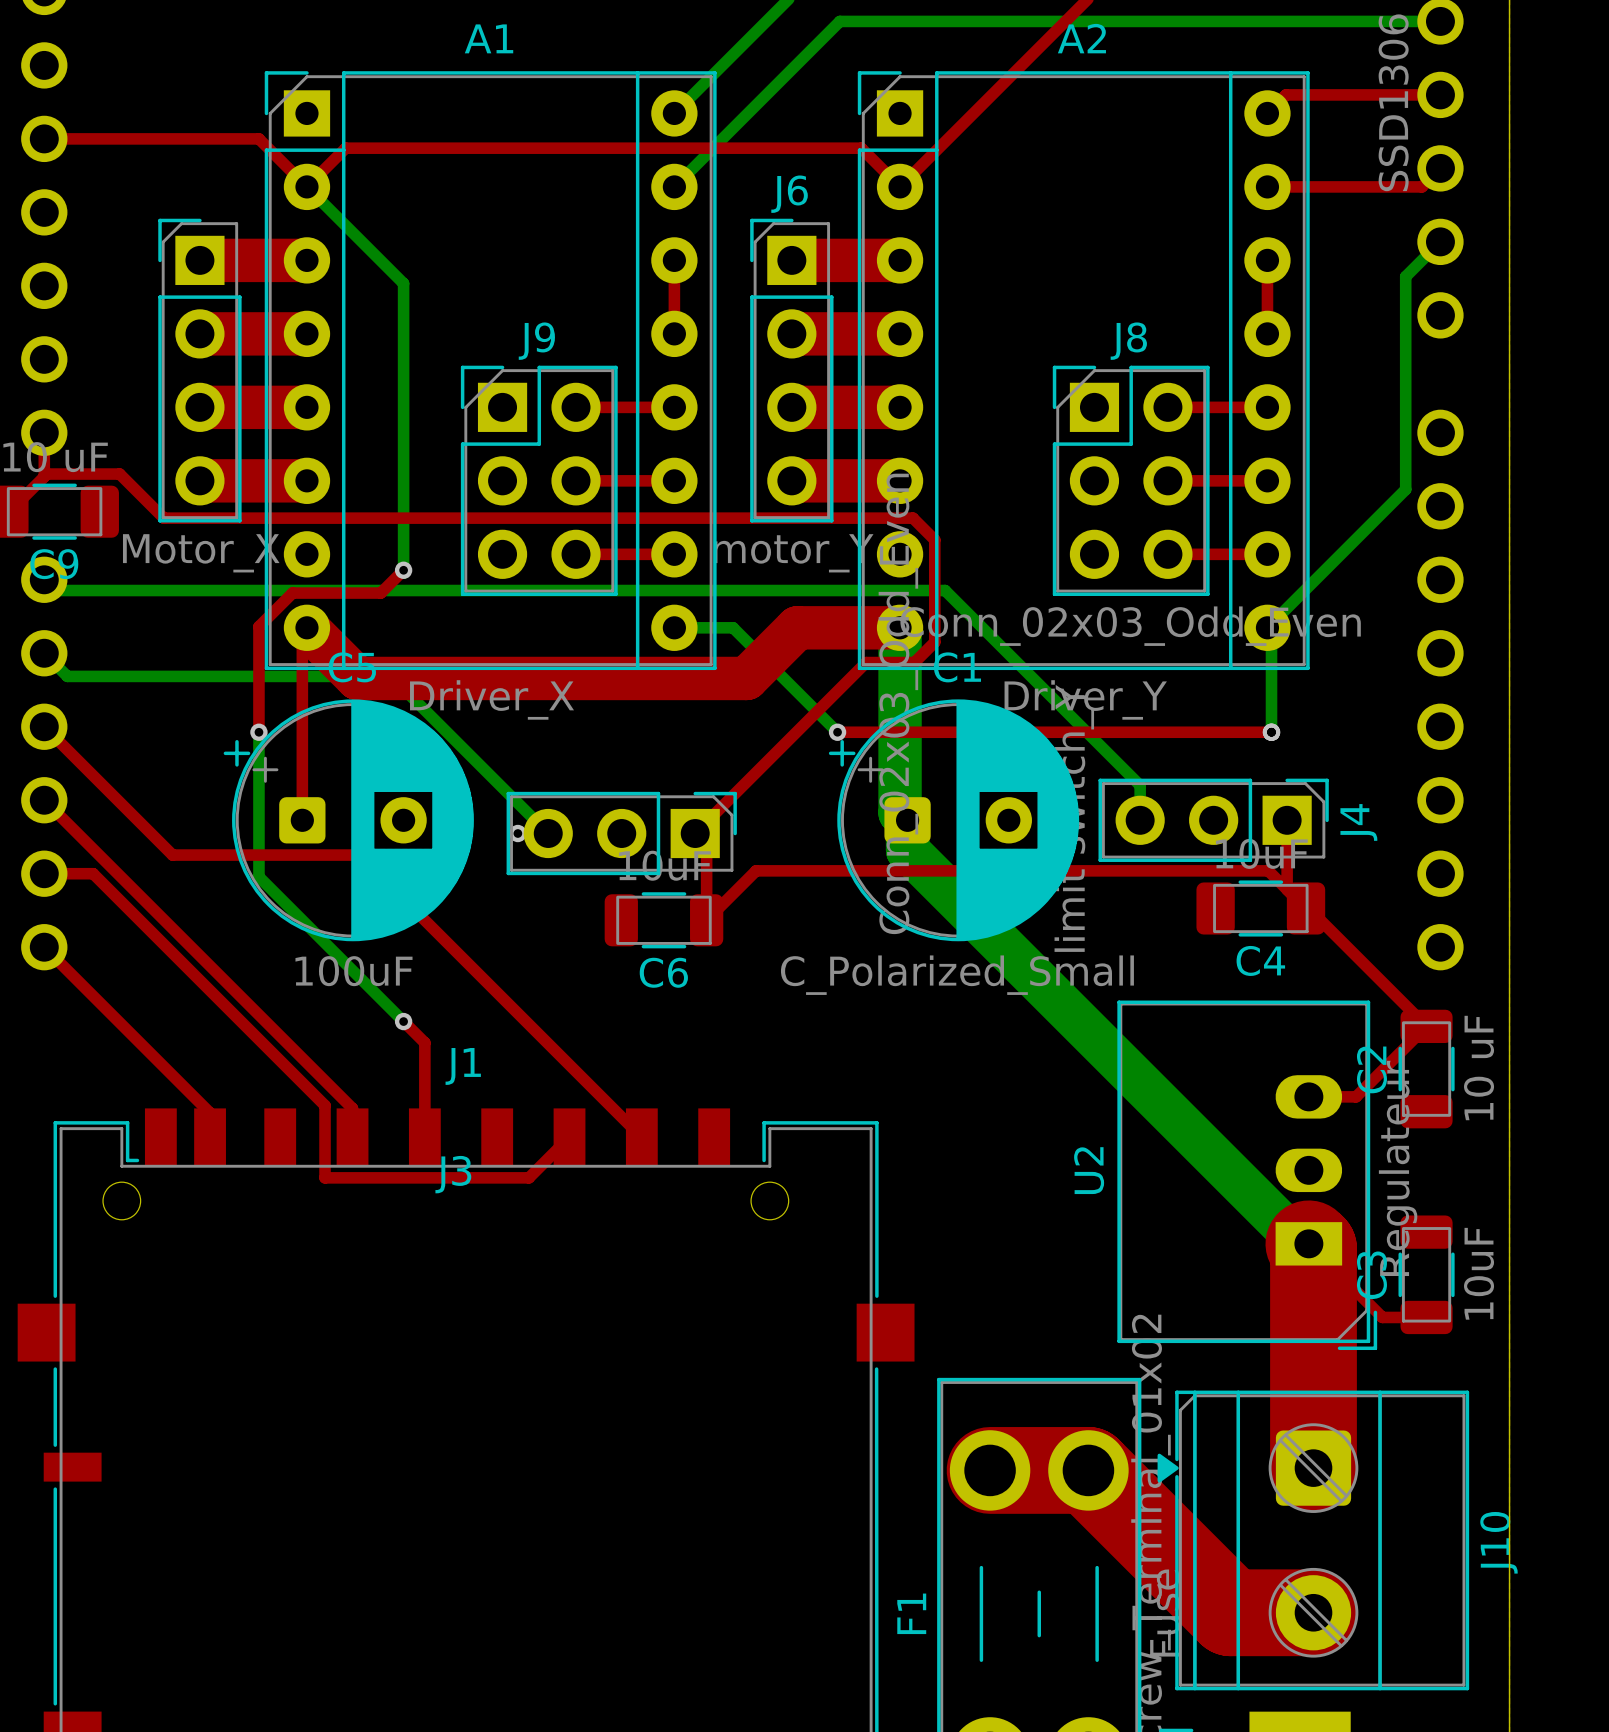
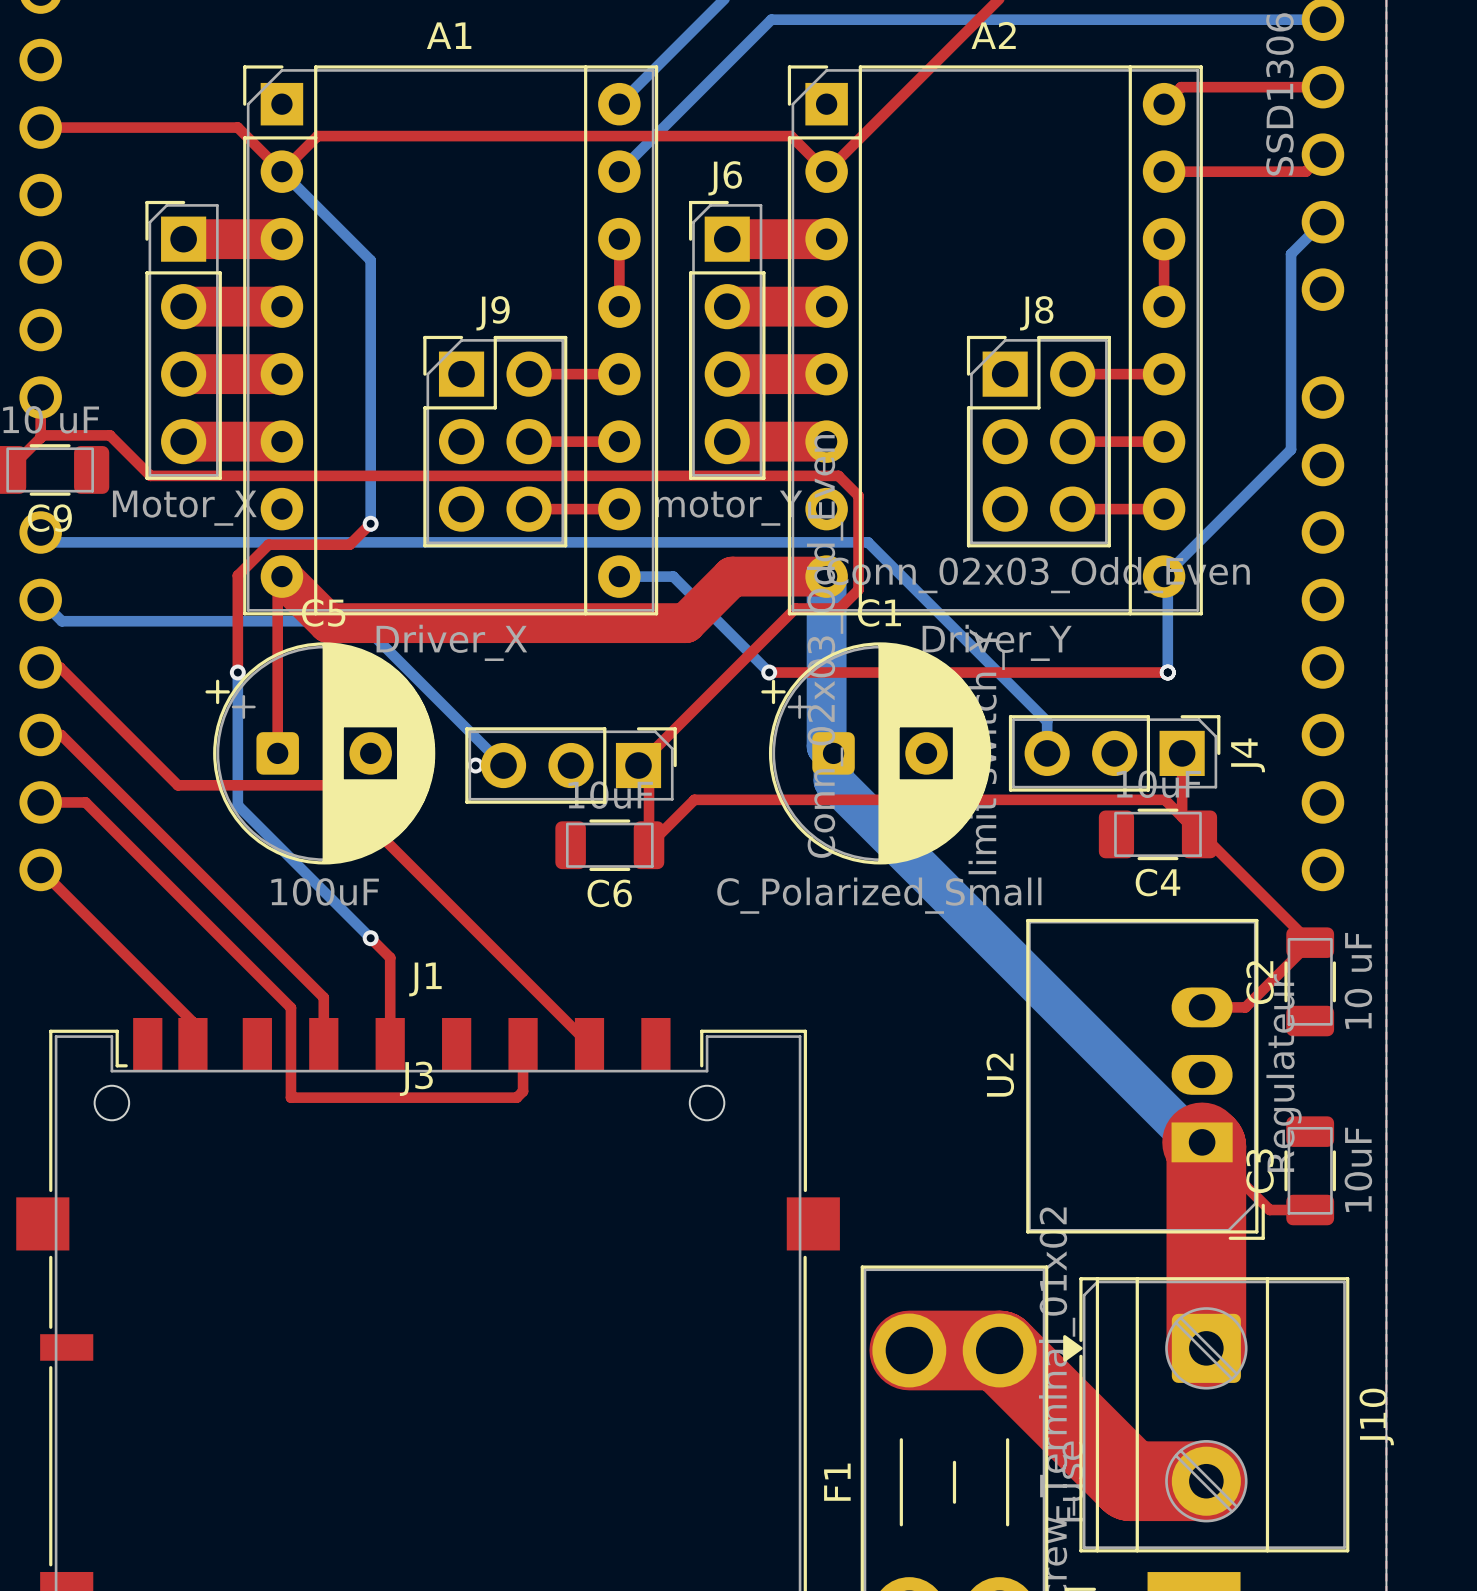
top track: (44, 726) (172, 855) (193, 855) -> (40, 667) (60, 667) (177, 785)
top track: (44, 800) (352, 1108) -> (40, 734) (61, 734) (323, 997) (323, 1018)
top track: (316, 1097) (325, 1105) (325, 1177) (528, 1177) (569, 1137) -> (290, 1007) (290, 1097) (516, 1097) (523, 1091) (523, 1044)

